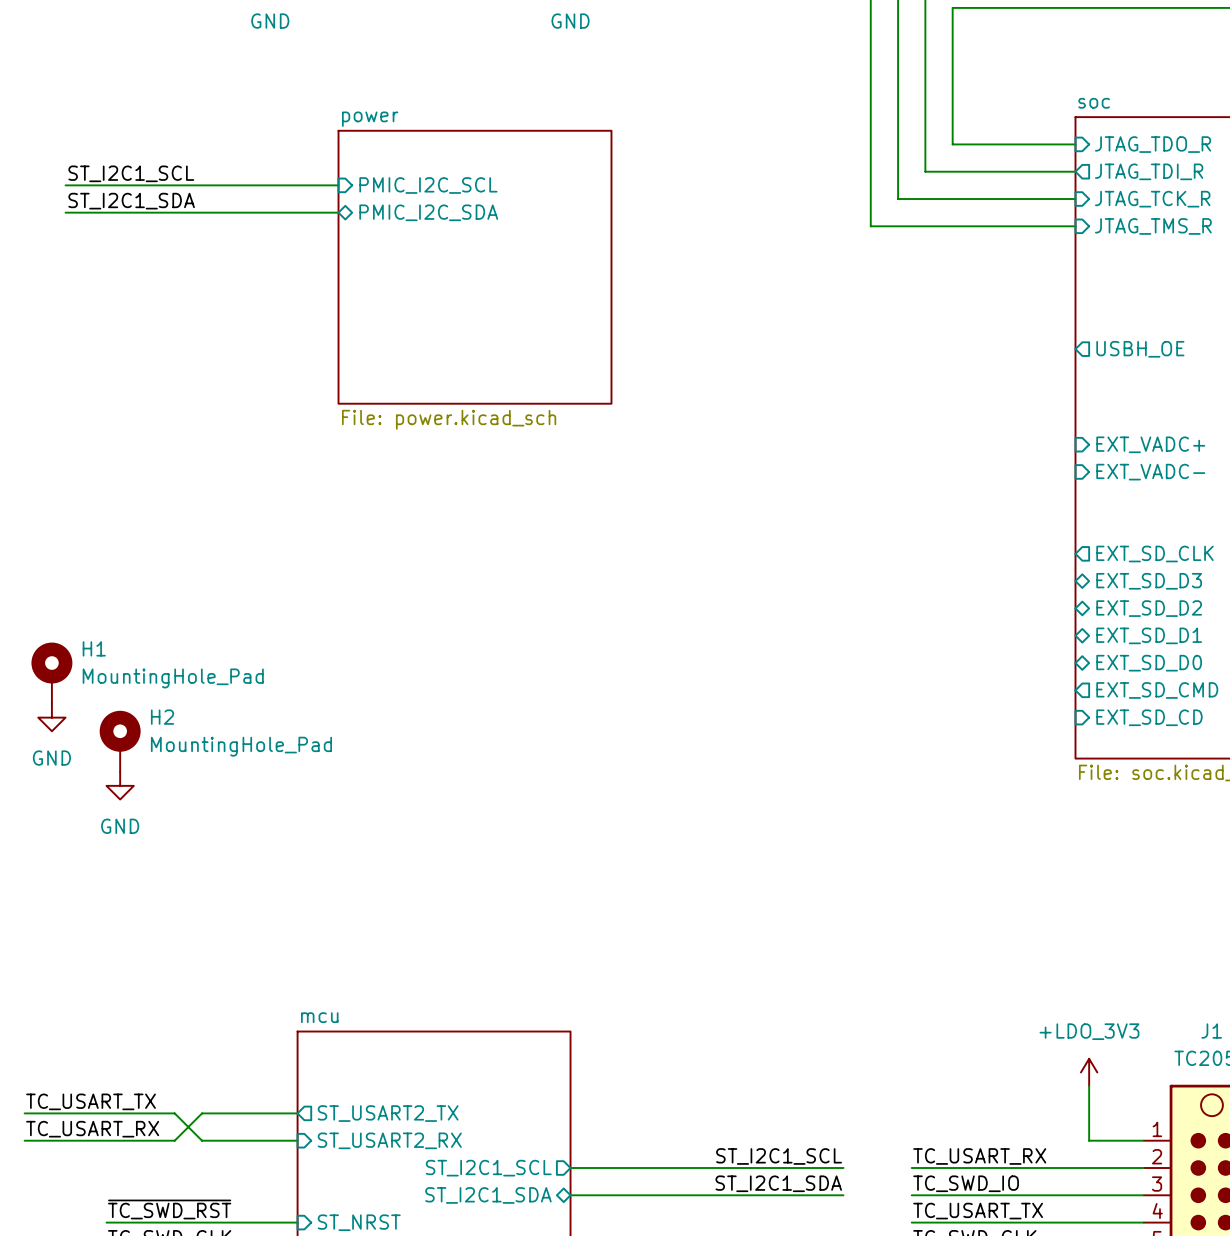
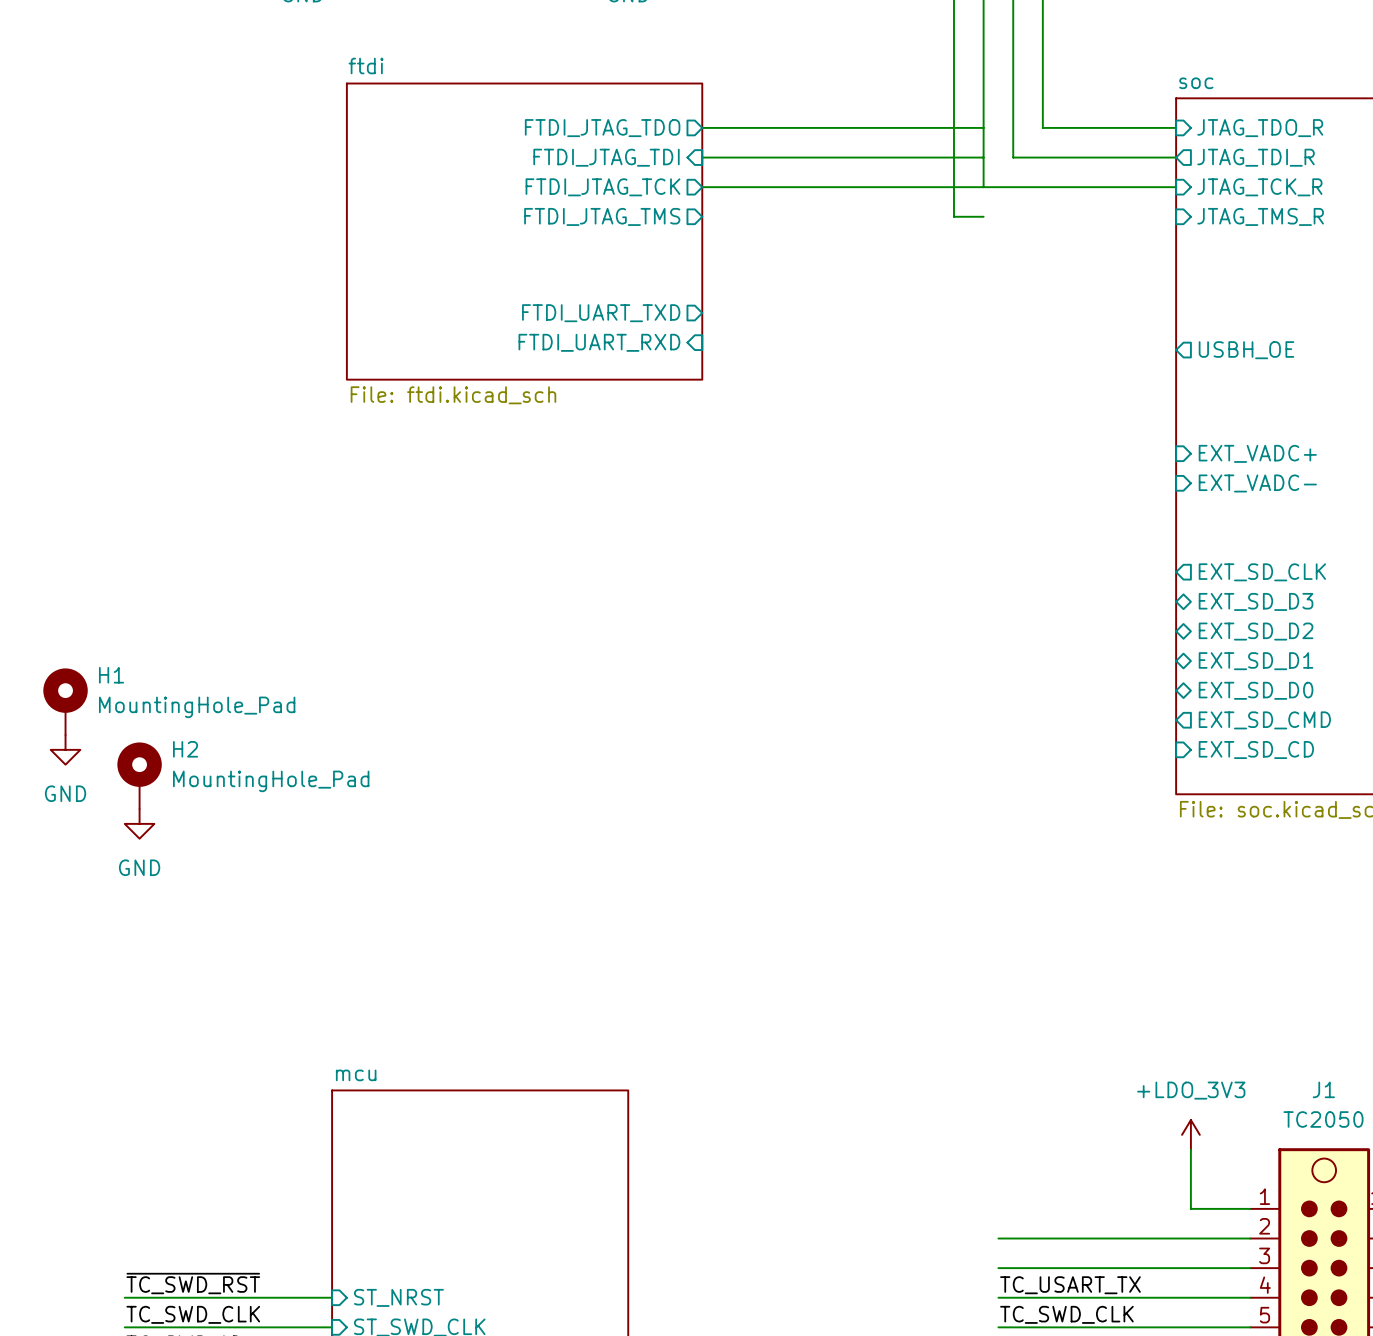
sheet pin: none -> FTDI_JTAG_TDO (602, 128)
wire: none -> (702, 127) (983, 127)
sheet pin: none -> FTDI_JTAG_TDI (606, 157)
wire: none -> (702, 157) (983, 157)
label: ST_I2C1_SCL (131, 173) -> none
wire: (65, 185) (338, 185) -> none
sheet pin: PMIC_I2C_SCL (428, 185) -> none
sheet pin: none -> FTDI_JTAG_TCK (602, 187)
wire: none -> (702, 187) (983, 187)
label: ST_I2C1_SDA (131, 201) -> none
wire: (65, 212) (338, 212) -> none
sheet pin: PMIC_I2C_SDA (428, 212) -> none
sheet pin: none -> FTDI_JTAG_TMS (602, 216)
wire: (898, 226) (1075, 226) -> none
sheet ftdi: none -> File: ftdi.kicad_sch (524, 231)
sheet power: File: power.kicad_sch (475, 267) -> none
sheet pin: none -> FTDI_UART_TXD (601, 313)
sheet pin: none -> FTDI_UART_RXD (599, 342)
label: TC_USART_TX (91, 1101) -> none
wire: (24, 1113) (174, 1113) (202, 1140) (297, 1140) -> none
wire: (297, 1113) (202, 1113) (174, 1140) (24, 1140) -> none
sheet pin: ST_USART2_TX (388, 1113) -> none
label: TC_USART_RX (92, 1129) -> none
sheet pin: ST_USART2_RX (389, 1140) -> none
label: ST_I2C1_SCL (779, 1156) -> none
label: TC_USART_RX (979, 1156) -> none
sheet pin: ST_I2C1_SCL (488, 1168) -> none
wire: (570, 1168) (843, 1168) -> none
label: ST_I2C1_SDA (778, 1183) -> none
label: TC_SWD_IO (966, 1183) -> none
sheet pin: ST_I2C1_SDA (488, 1195) -> none
wire: (570, 1195) (843, 1195) -> none

